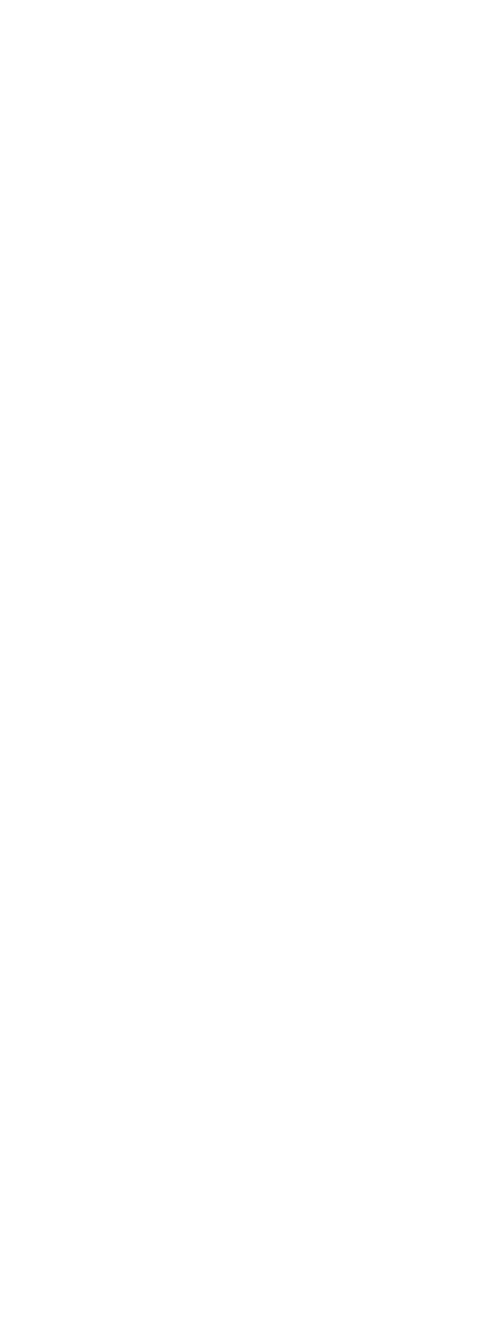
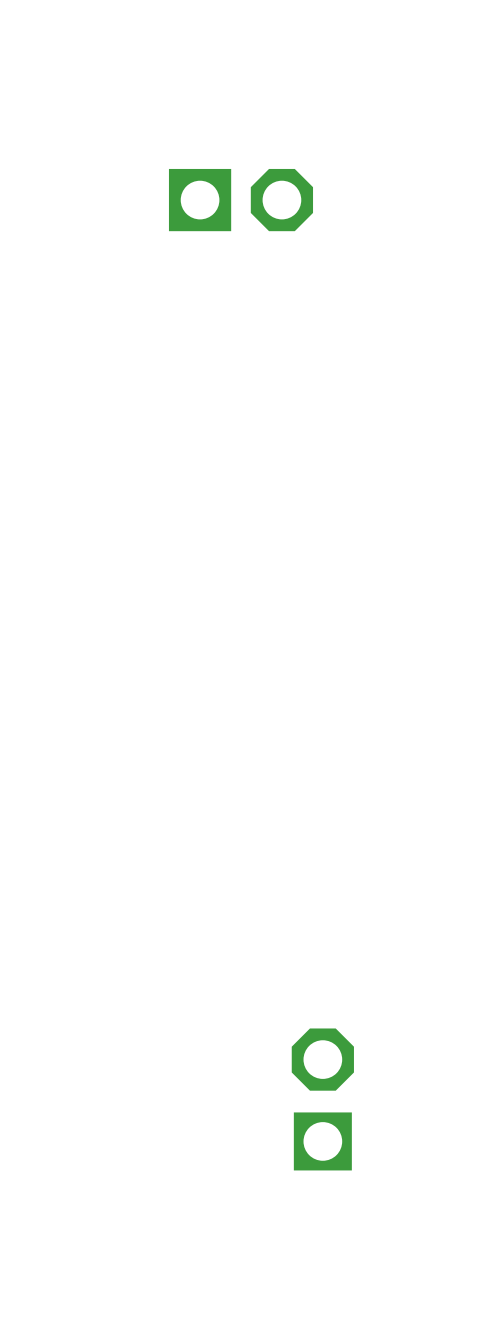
part: none -> (240, 200)
part: none -> (322, 1099)

